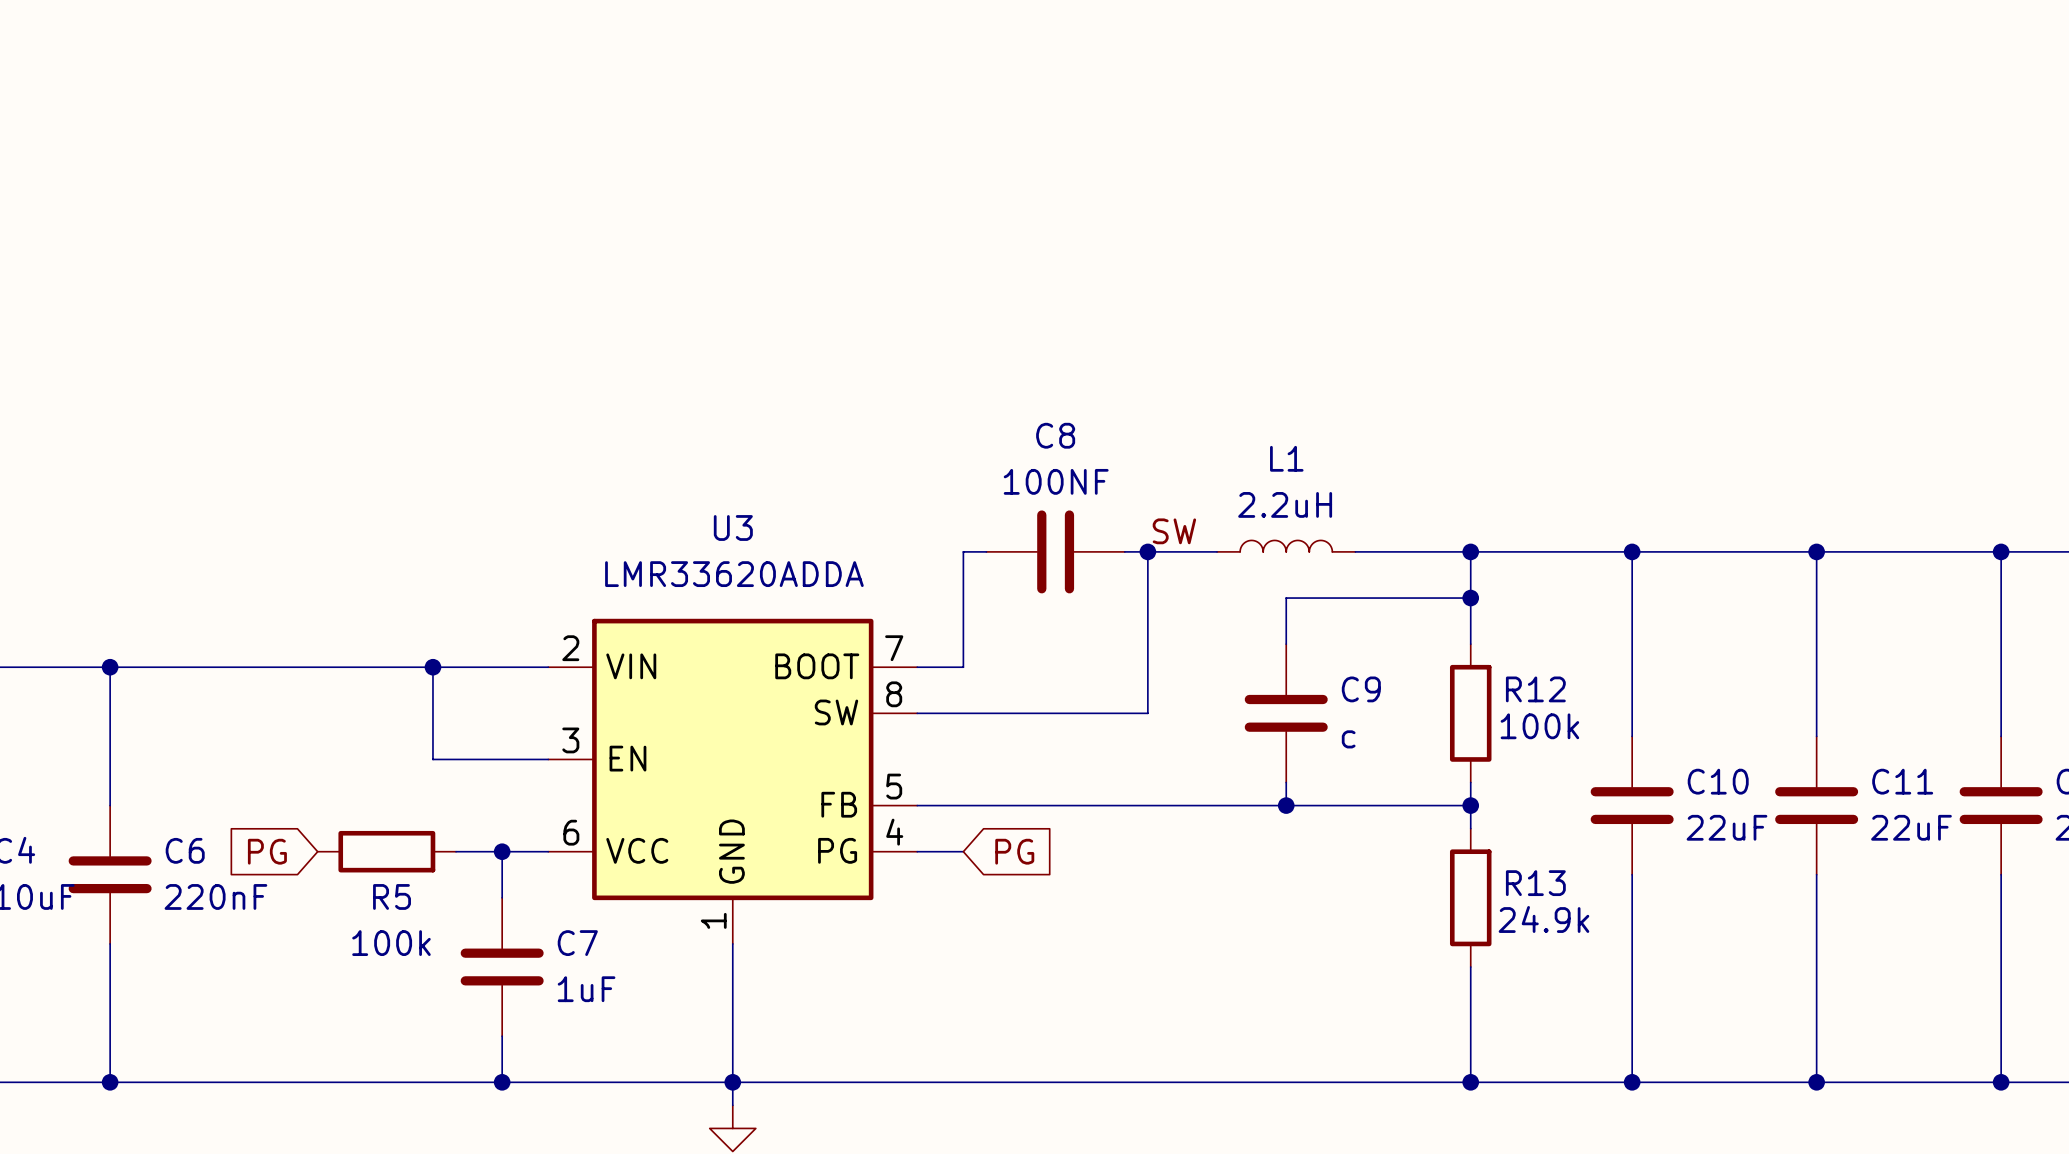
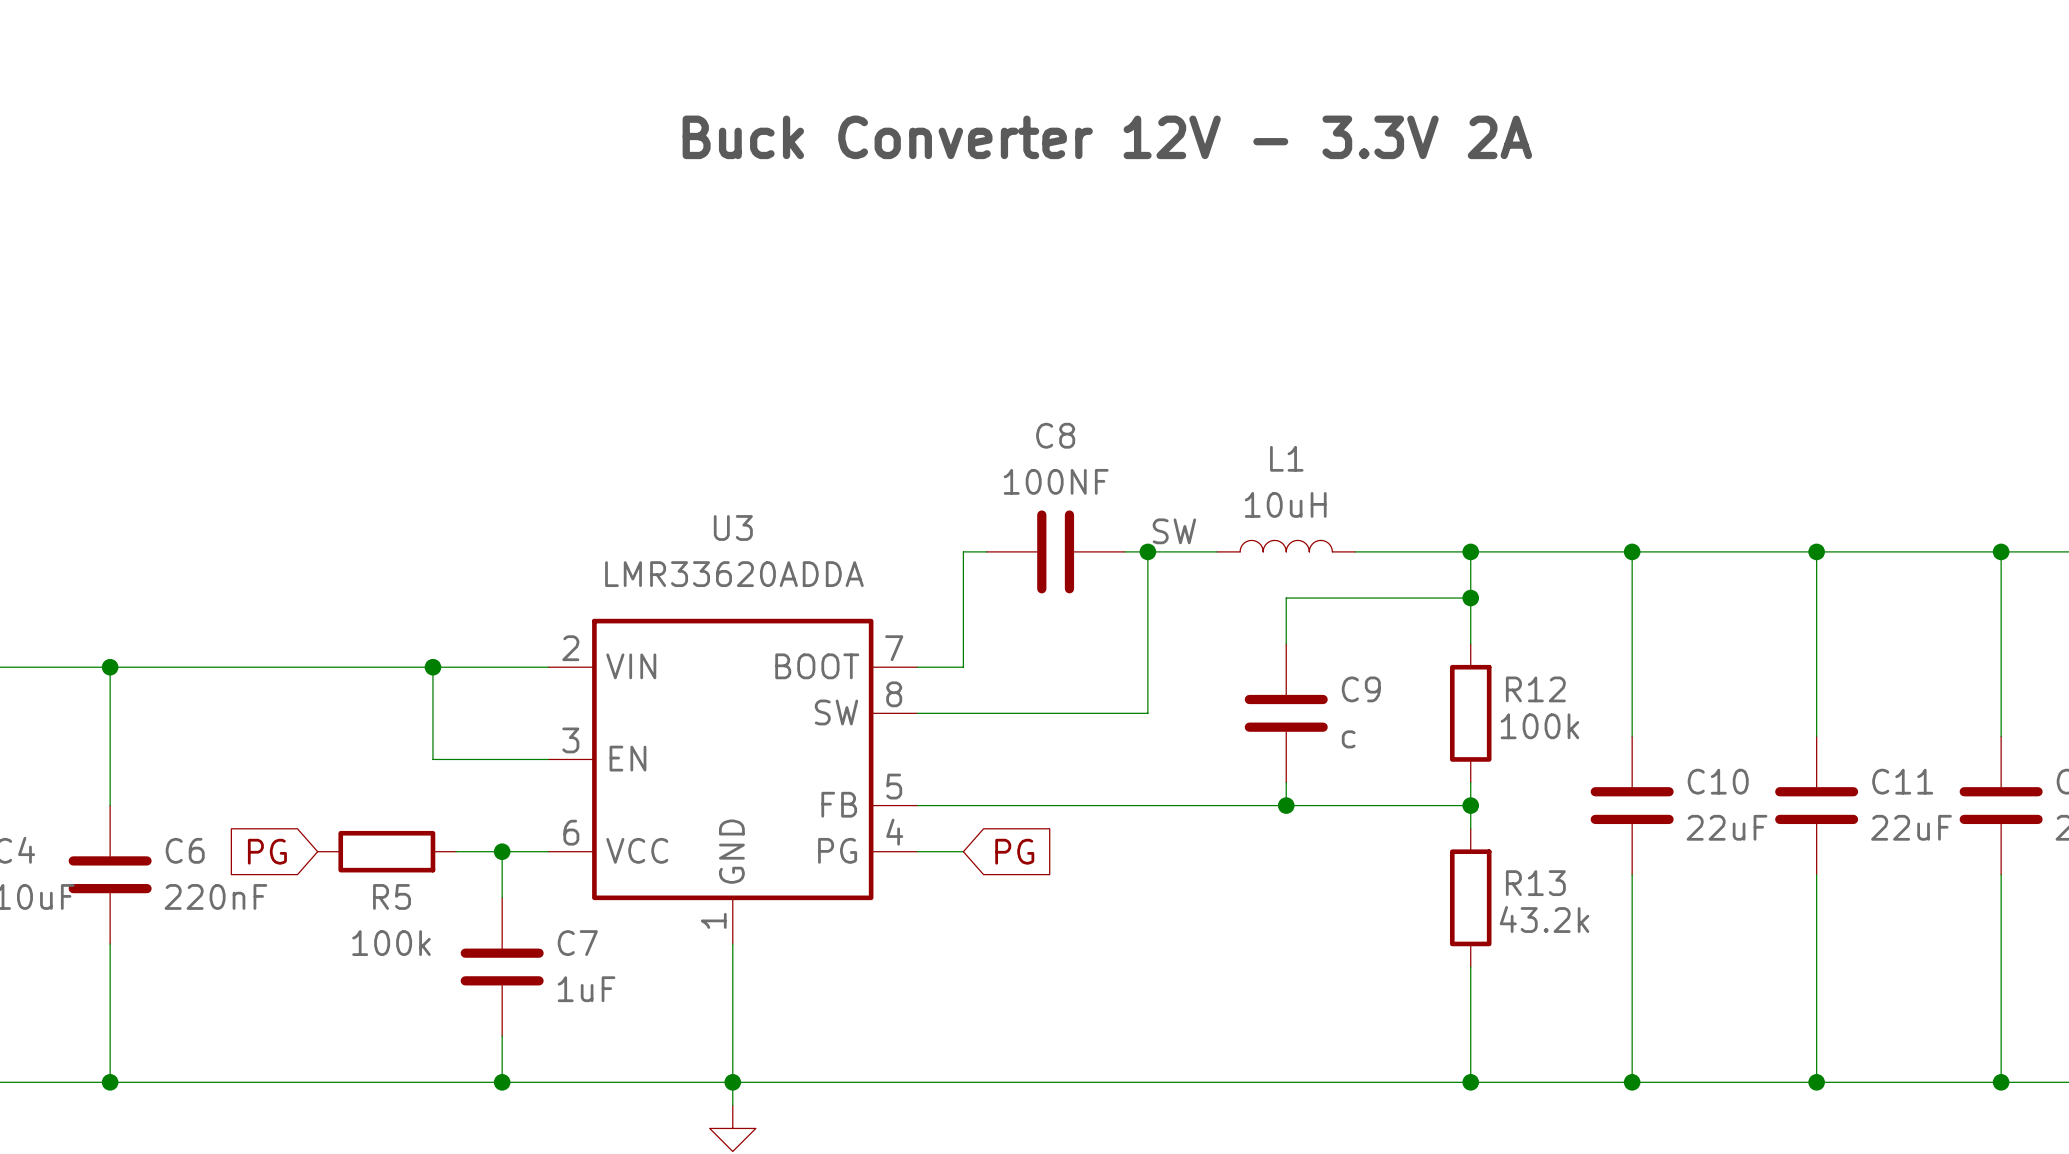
text: none -> Buck Converter 12V - 3.3V 2A (1107, 137)
L1 value: 2.2uH (1285, 504) -> 10uH (1285, 504)
R13 value: 24.9k (1543, 919) -> 43.2k (1544, 919)

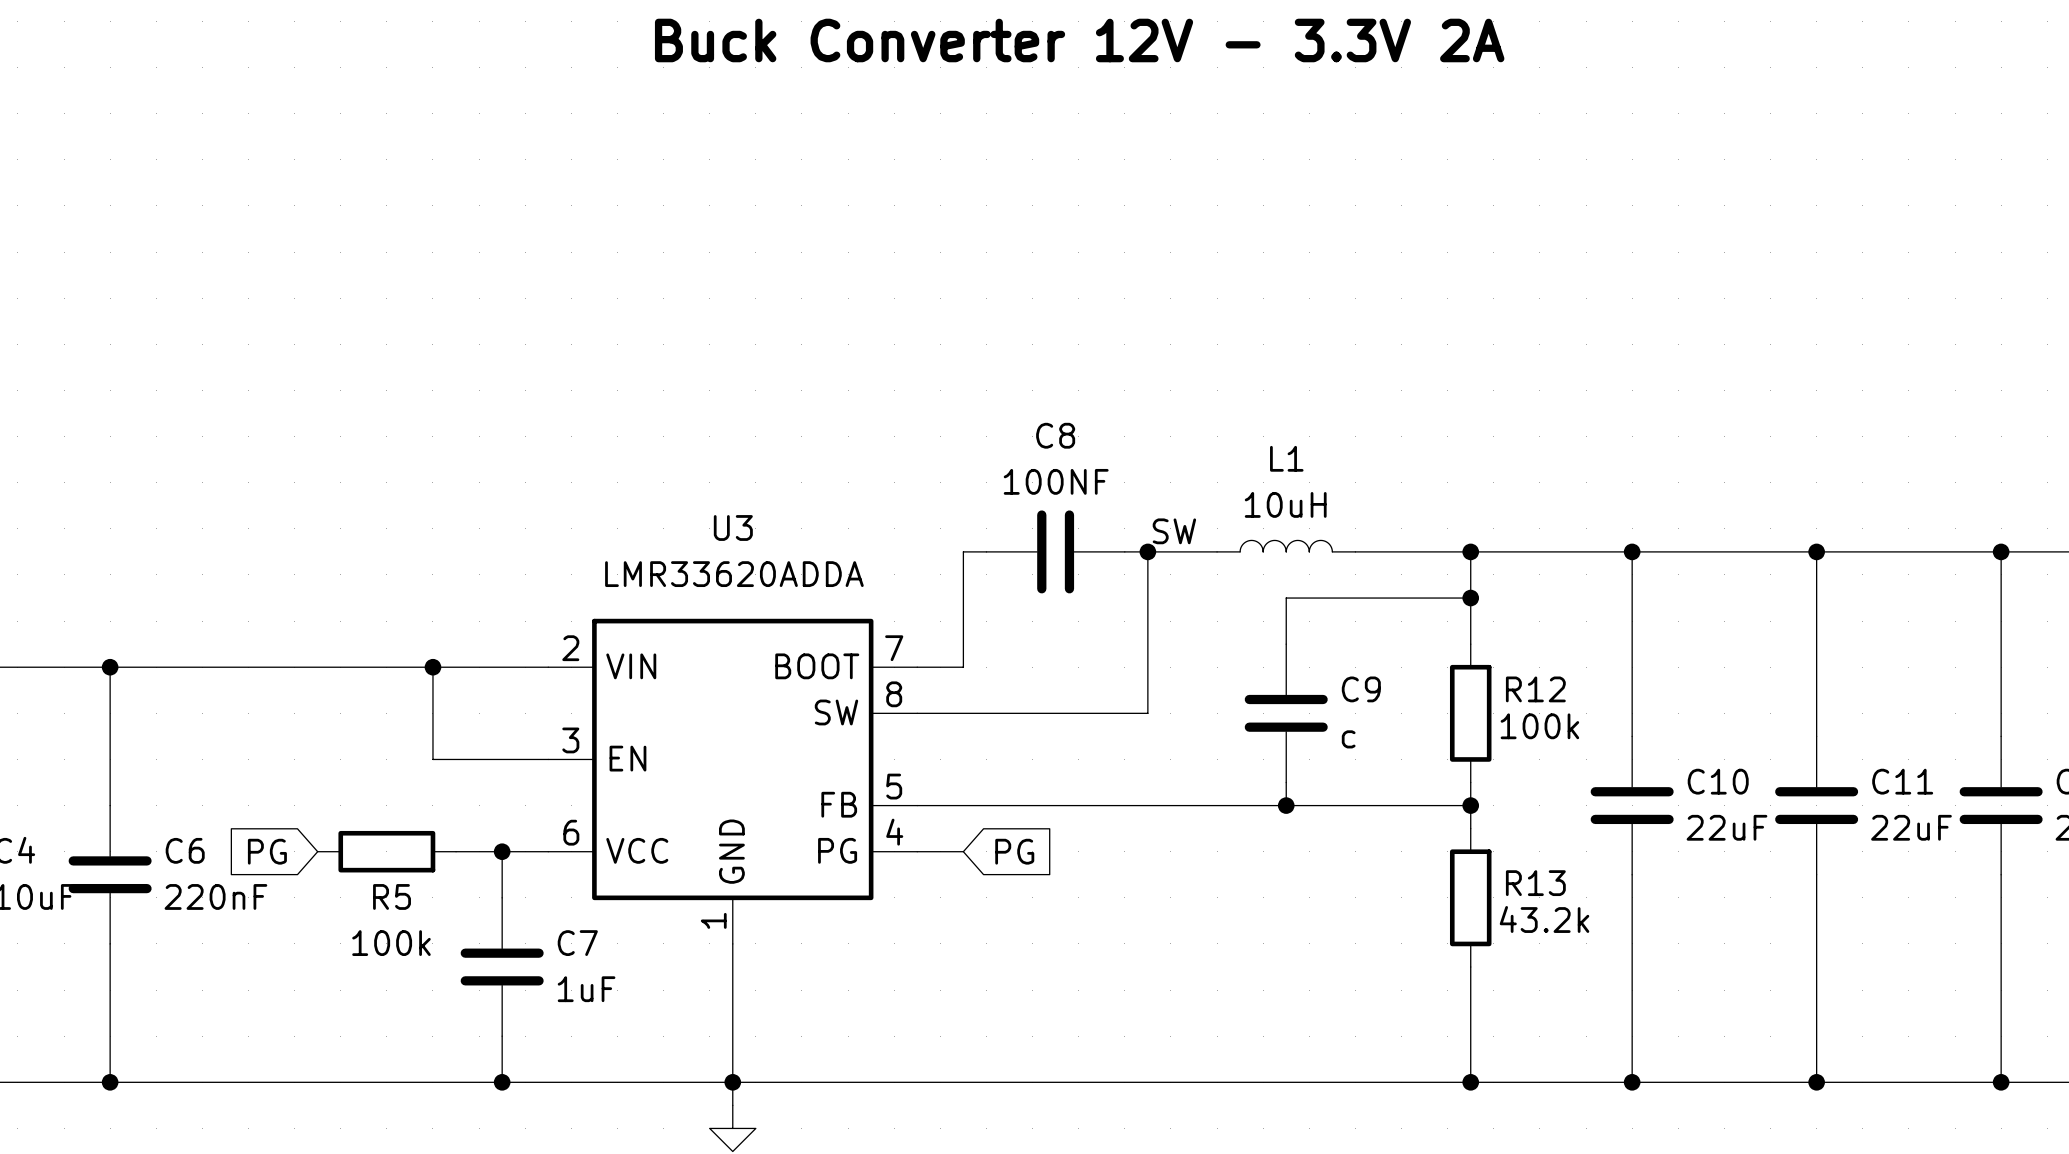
text position: Buck Converter 12V - 3.3V 2A (1107, 137) -> Buck Converter 12V - 3.3V 2A (1079, 40)

